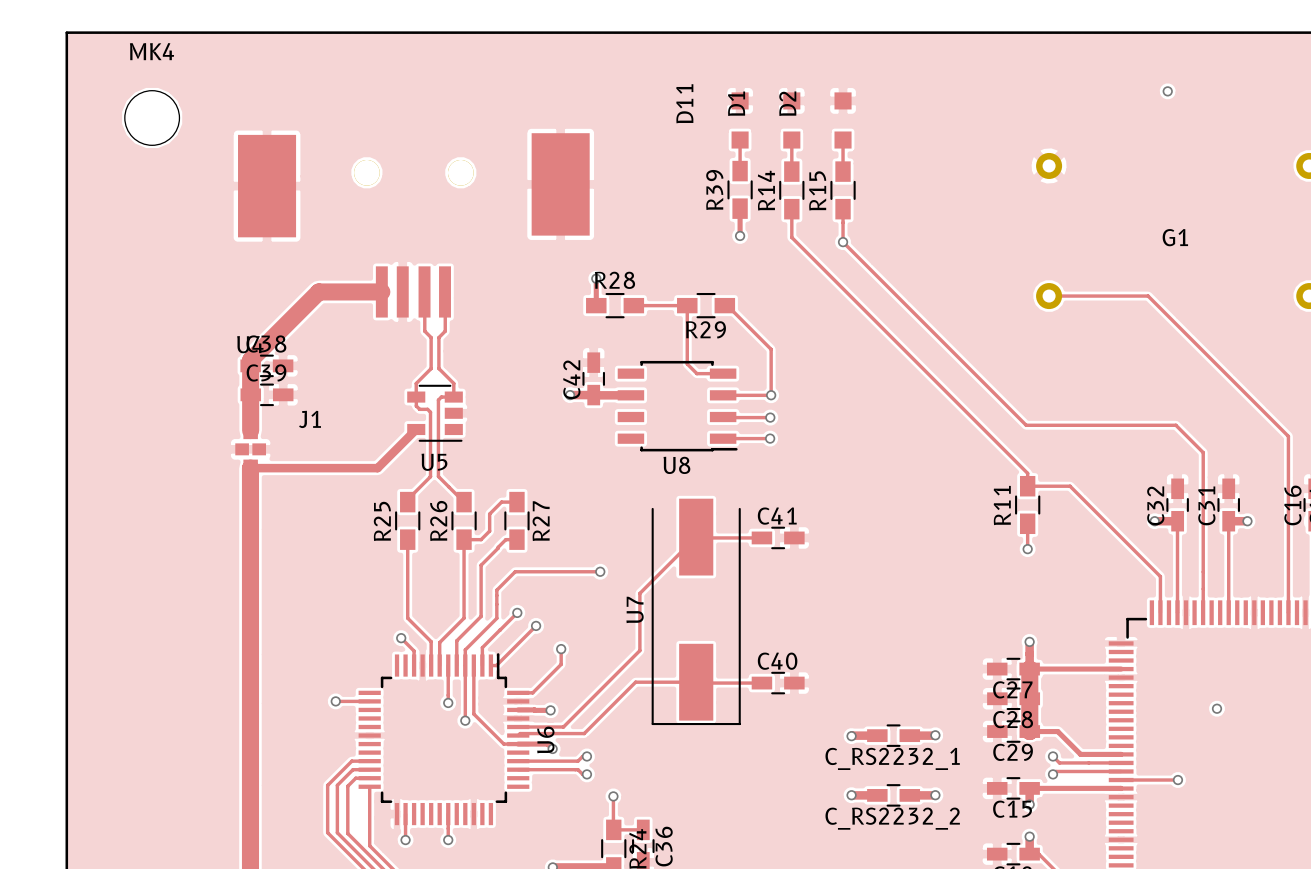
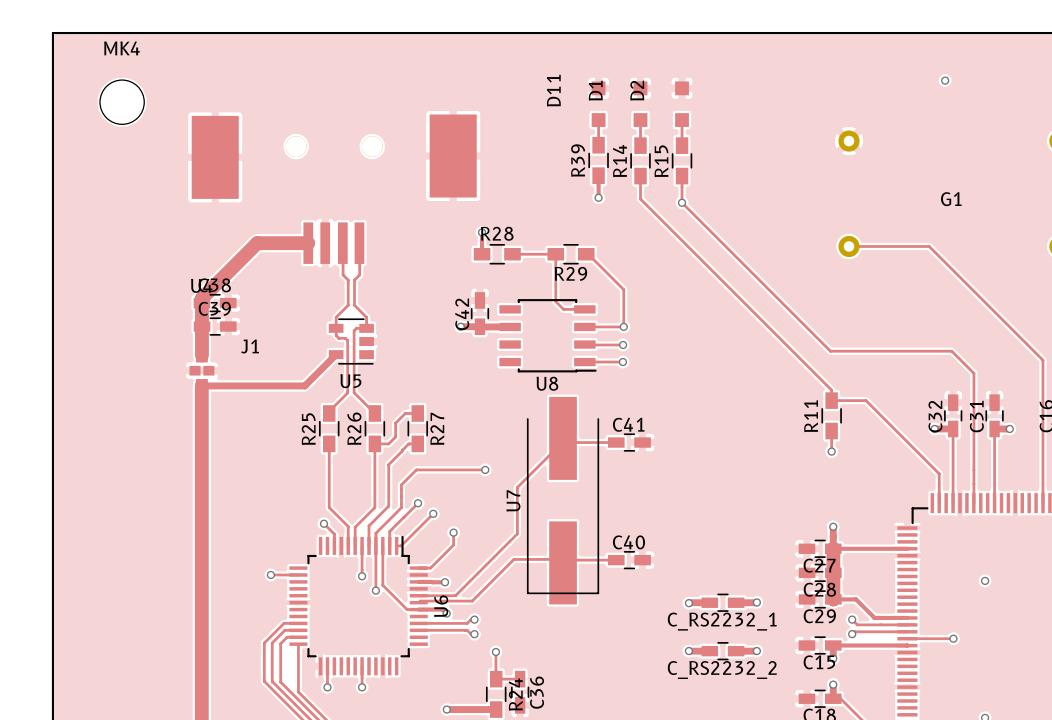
U7 footprint: [651, 498, 741, 726] -> [526, 396, 600, 605]

